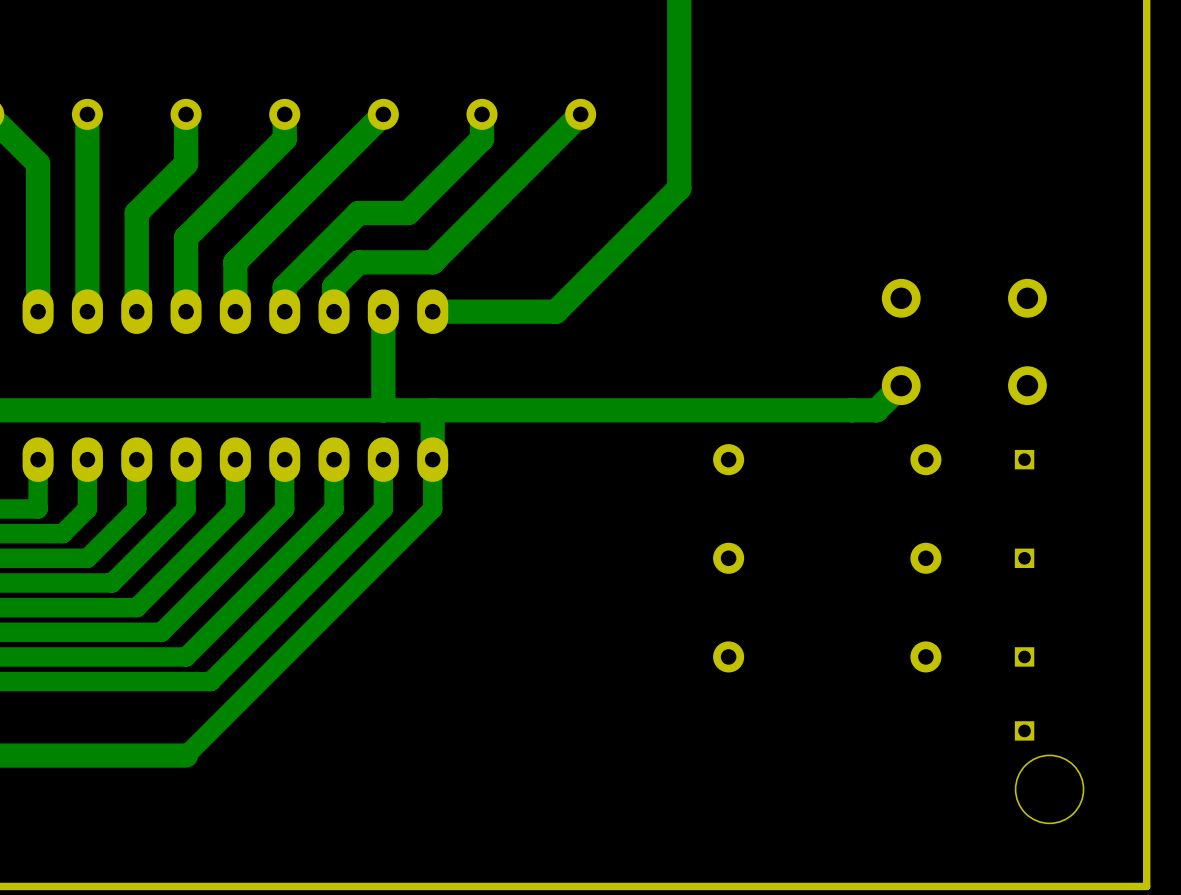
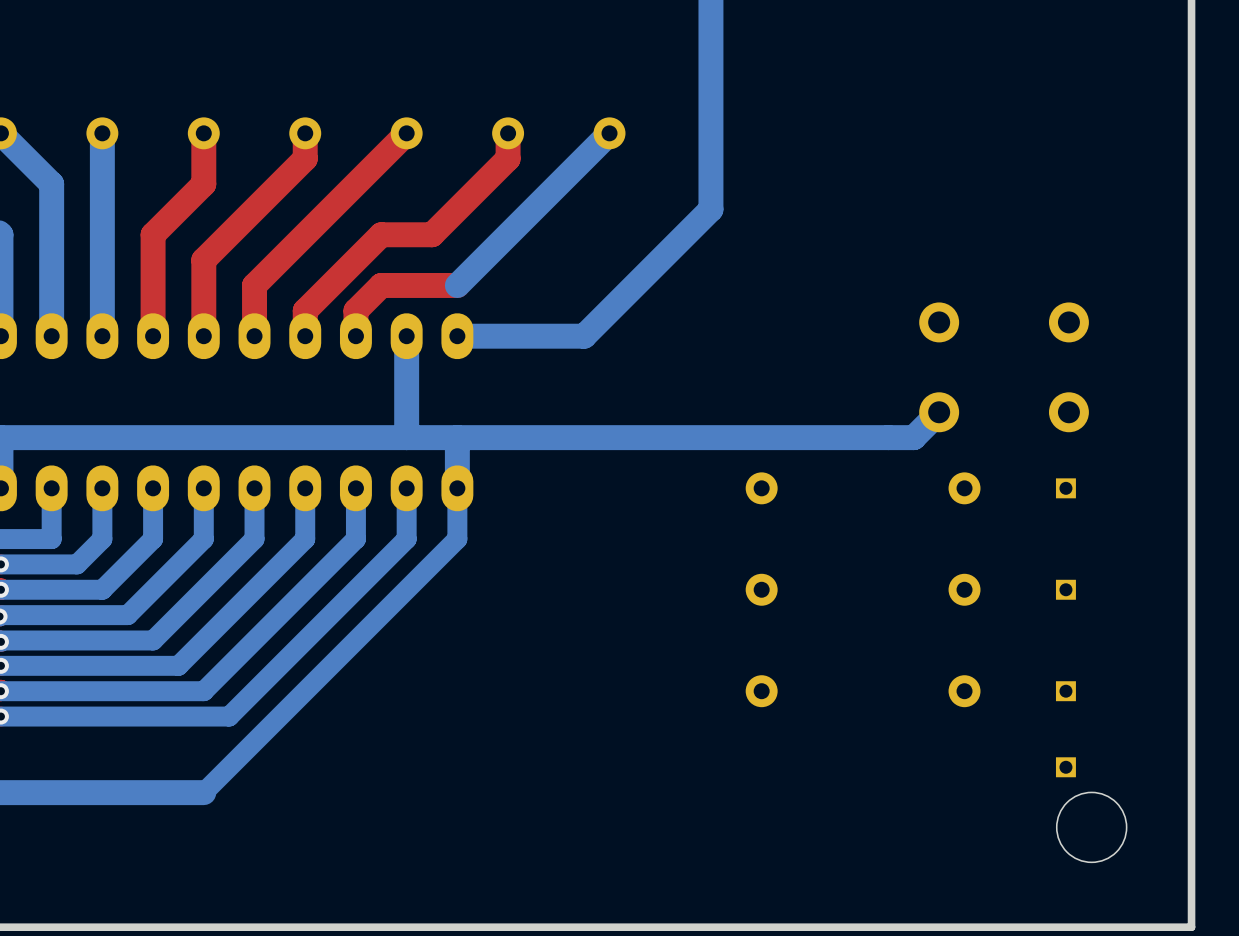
bottom track: (186, 114) (186, 163) (136, 213) (136, 311) -> none
top track: none -> (203, 133) (203, 184) (153, 234) (153, 336)
bottom track: (284, 114) (284, 139) (186, 237) (186, 311) -> none
top track: none -> (305, 133) (305, 158) (203, 260) (203, 336)
bottom track: (383, 114) (235, 262) (235, 311) -> none
top track: none -> (406, 133) (254, 285) (254, 336)
bottom track: (482, 114) (482, 139) (408, 213) (358, 213) (284, 287) (284, 311) -> none
top track: none -> (508, 133) (508, 158) (432, 234) (381, 234) (305, 310) (305, 336)
bottom track: (432, 262) (358, 262) (334, 287) (334, 311) -> none
top track: none -> (457, 285) (381, 285) (355, 310) (355, 336)

